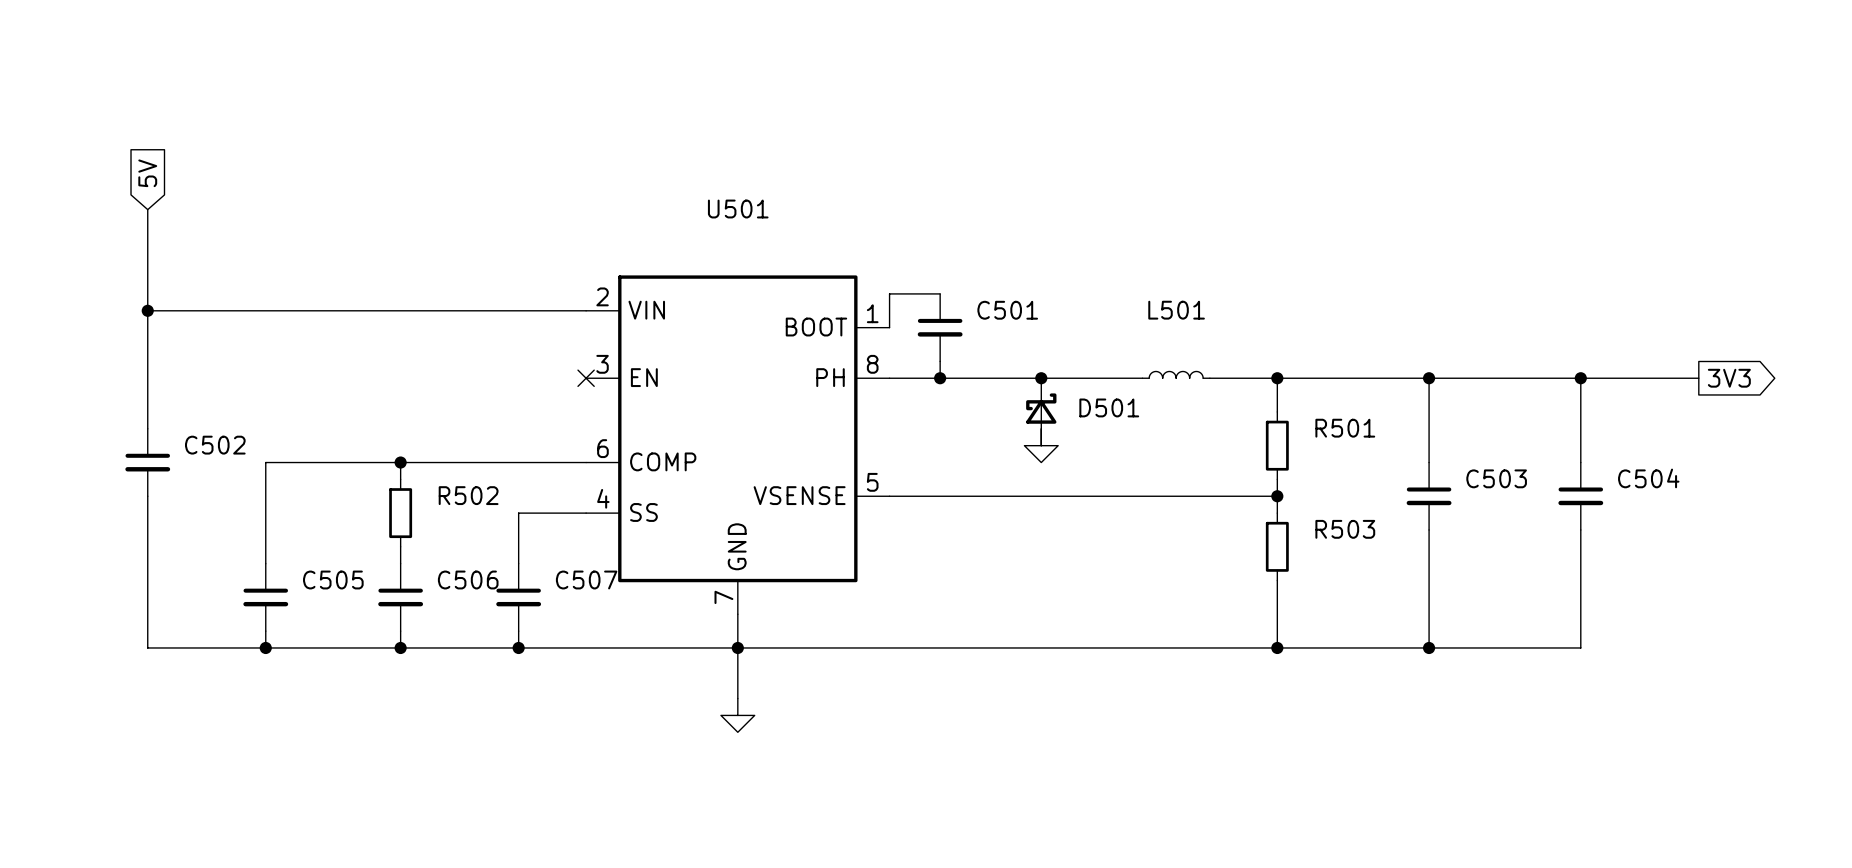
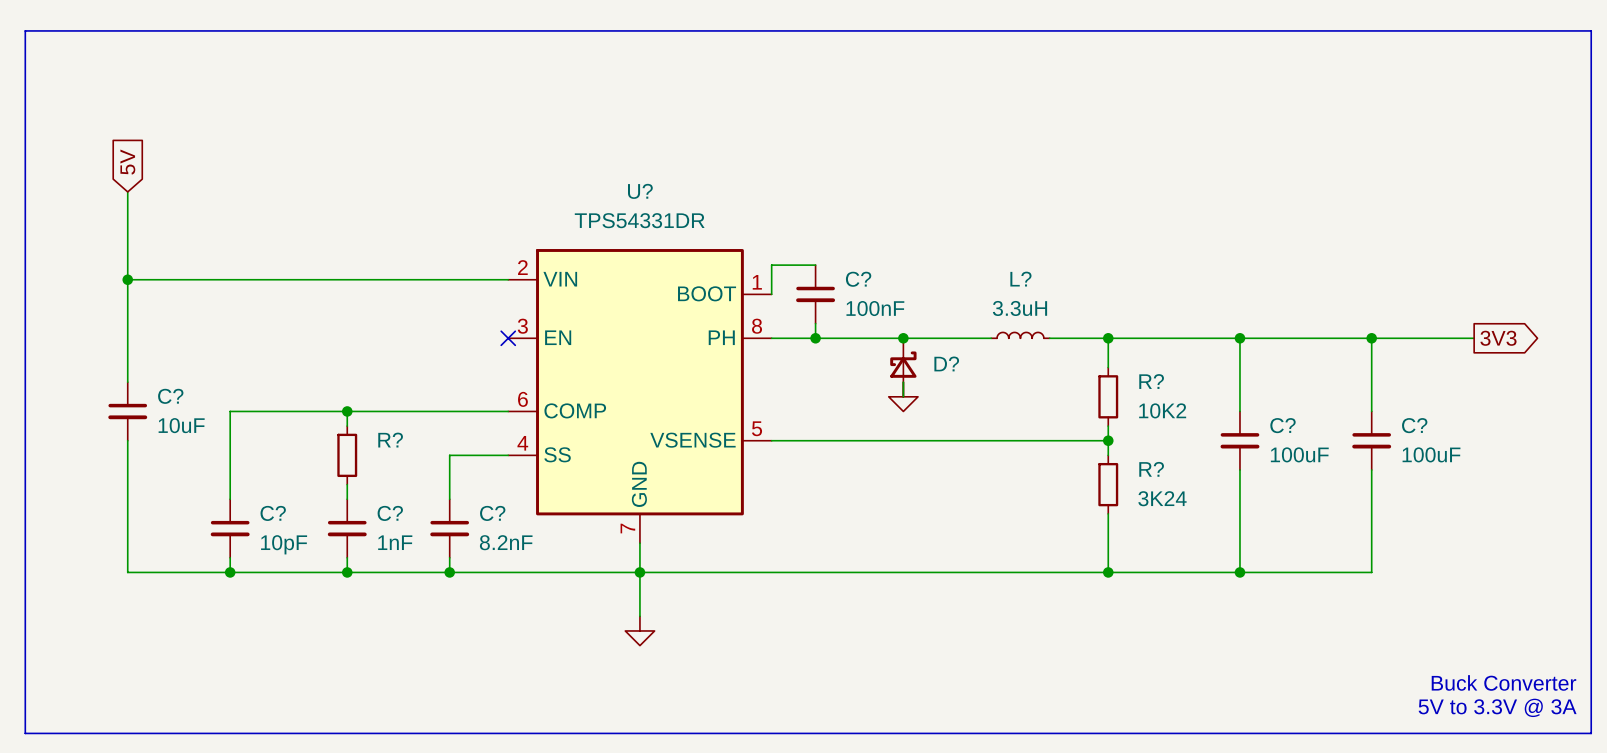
line: none -> (25, 30) (1591, 30) (1591, 733) (25, 733) (25, 30)
U501 name: U501 (738, 209) -> U? (640, 191)
U501 value: none -> TPS54331DR (639, 220)
C501 name: C501 (1007, 310) -> C? (858, 279)
L501 name: L501 (1176, 310) -> L? (1020, 279)
C501 value: none -> 100nF (875, 308)
L501 value: none -> 3.3uH (1020, 308)
D501 name: D501 (1109, 407) -> D? (946, 363)
R501 name: R501 (1345, 428) -> R? (1151, 381)
C502 name: C502 (215, 445) -> C? (170, 396)
R501 value: none -> 10K2 (1162, 410)
C502 value: none -> 10uF (181, 425)
C503 name: C503 (1496, 478) -> C? (1282, 425)
C504 name: C504 (1648, 478) -> C? (1414, 425)
R502 name: R502 (468, 495) -> R? (390, 440)
C503 value: none -> 100uF (1299, 454)
C504 value: none -> 100uF (1431, 454)
R503 name: R503 (1345, 529) -> R? (1151, 469)
R503 value: none -> 3K24 (1162, 498)
C505 name: C505 (333, 580) -> C? (273, 513)
C506 name: C506 (468, 580) -> C? (390, 513)
C507 name: C507 (586, 580) -> C? (492, 513)
C506 value: none -> 1nF (395, 542)
C507 value: none -> 8.2nF (506, 542)
C505 value: none -> 10pF (284, 544)
text: none -> Buck Converter (1503, 682)
text: none -> 5V to 3.3V @ 3A (1497, 707)

